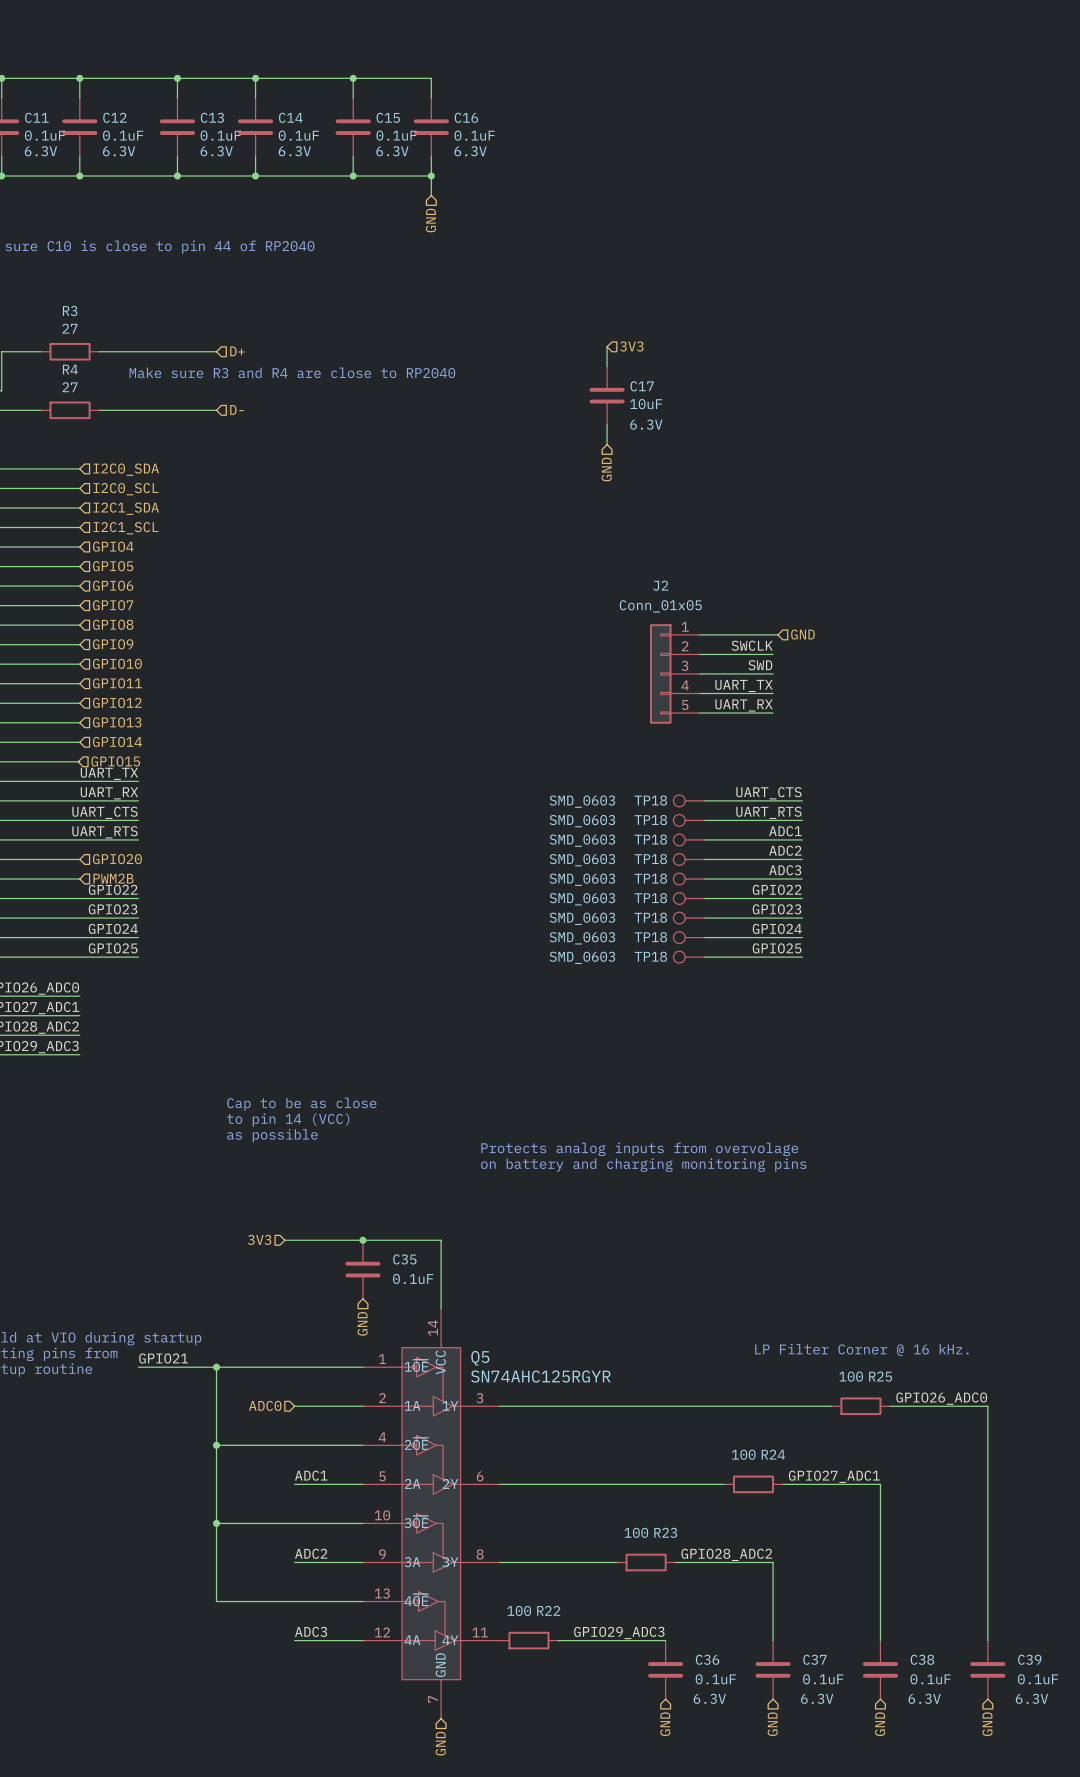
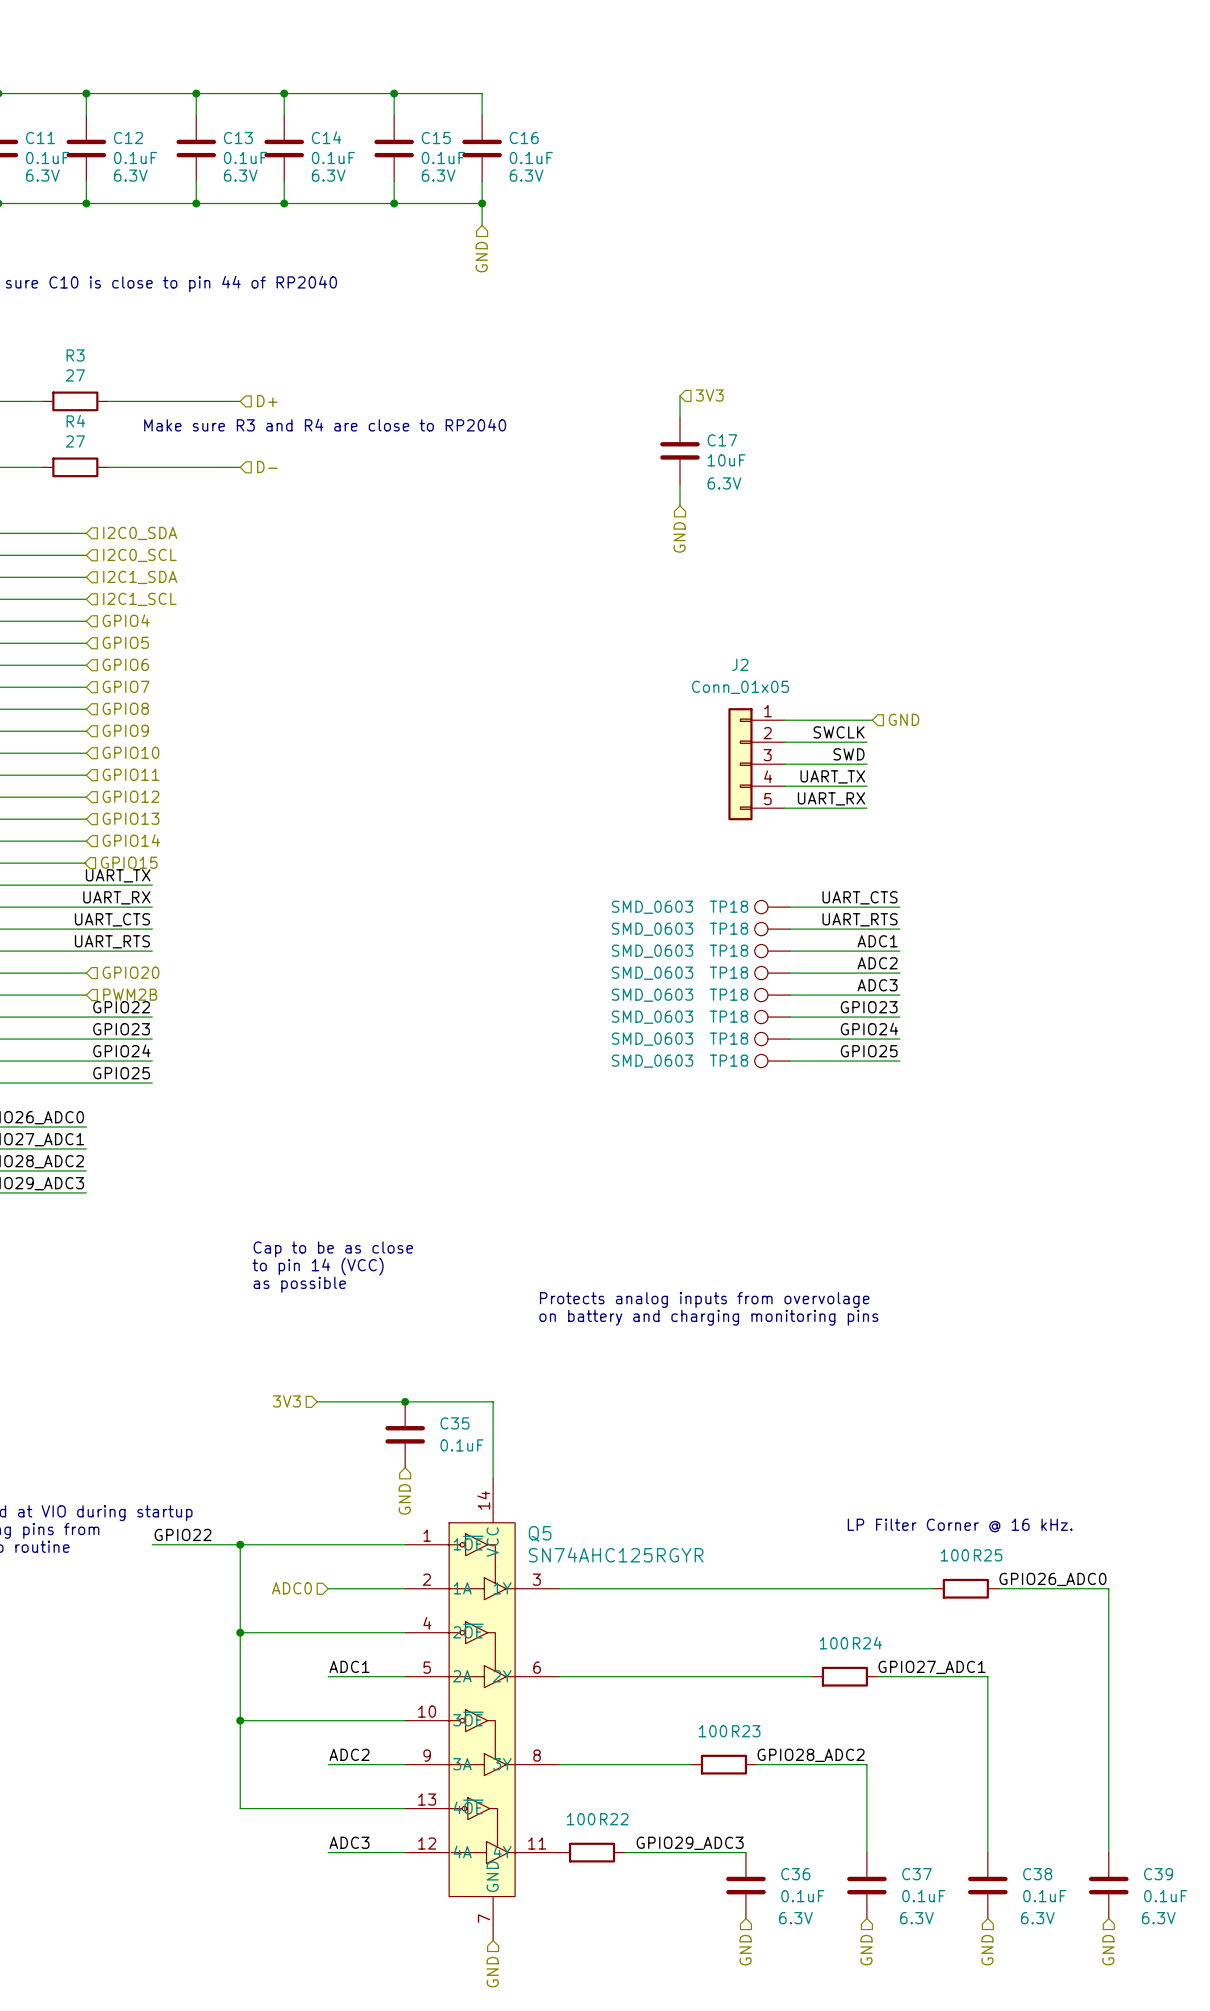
label: GPIO22 (777, 889) -> GPIO23 (869, 1007)
label: GPIO23 (776, 909) -> GPIO24 (869, 1028)
label: GPIO24 (777, 928) -> GPIO25 (869, 1051)
label: GPIO25 (777, 948) -> none
TP18: SMD_0603 (689, 957) -> none
wire: (704, 957) (802, 957) -> none
label: GPIO21 (163, 1358) -> GPIO22 (183, 1534)

